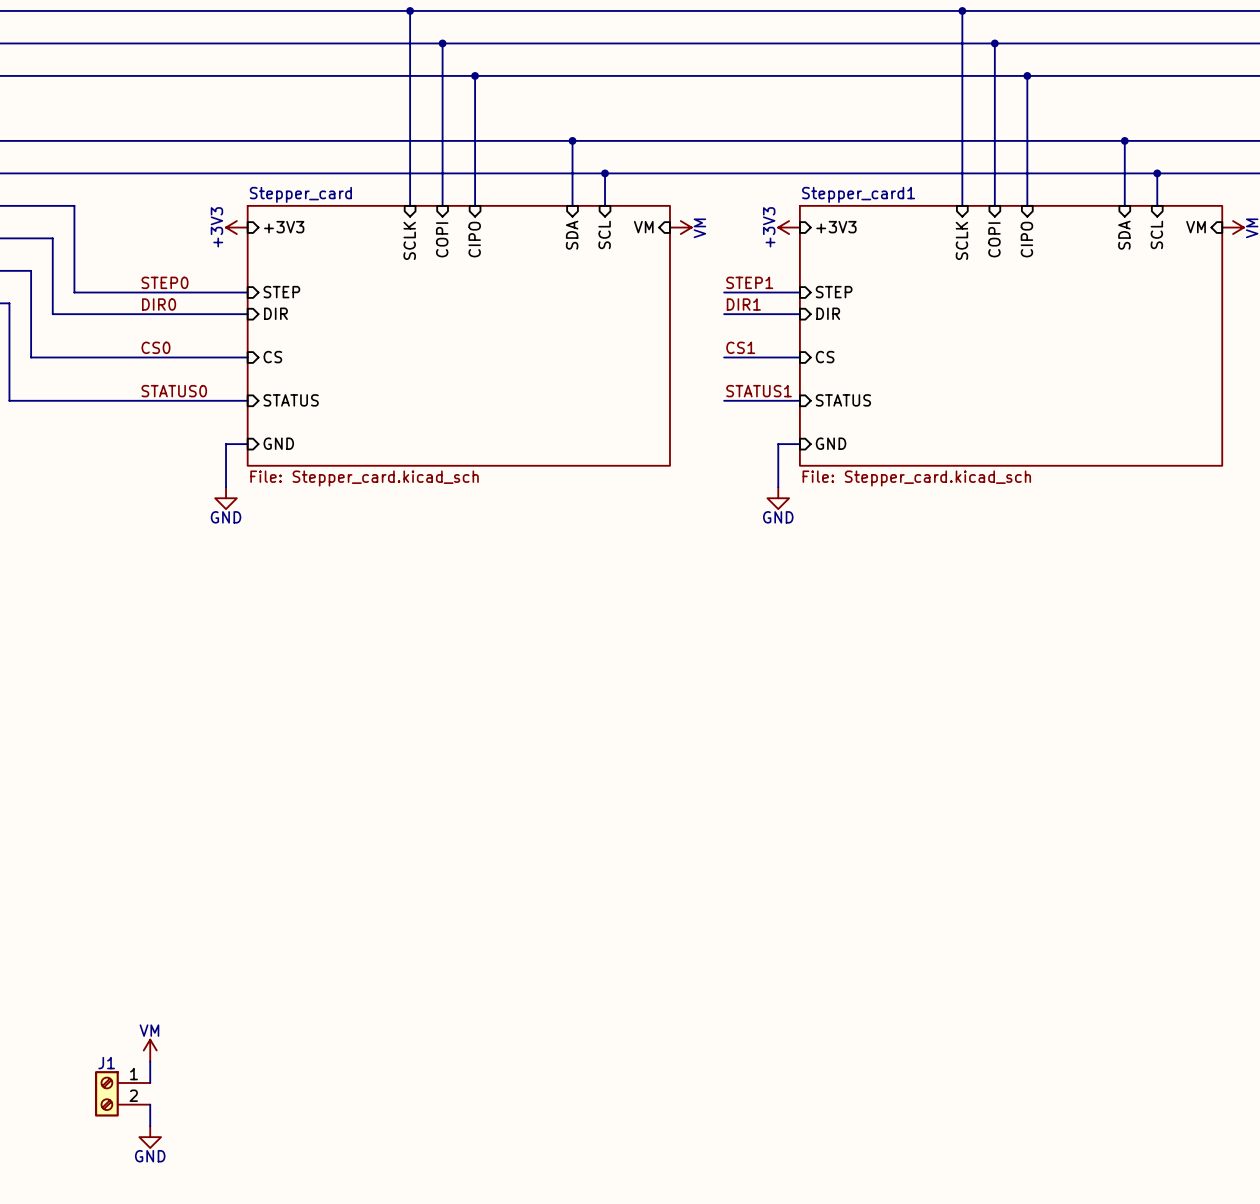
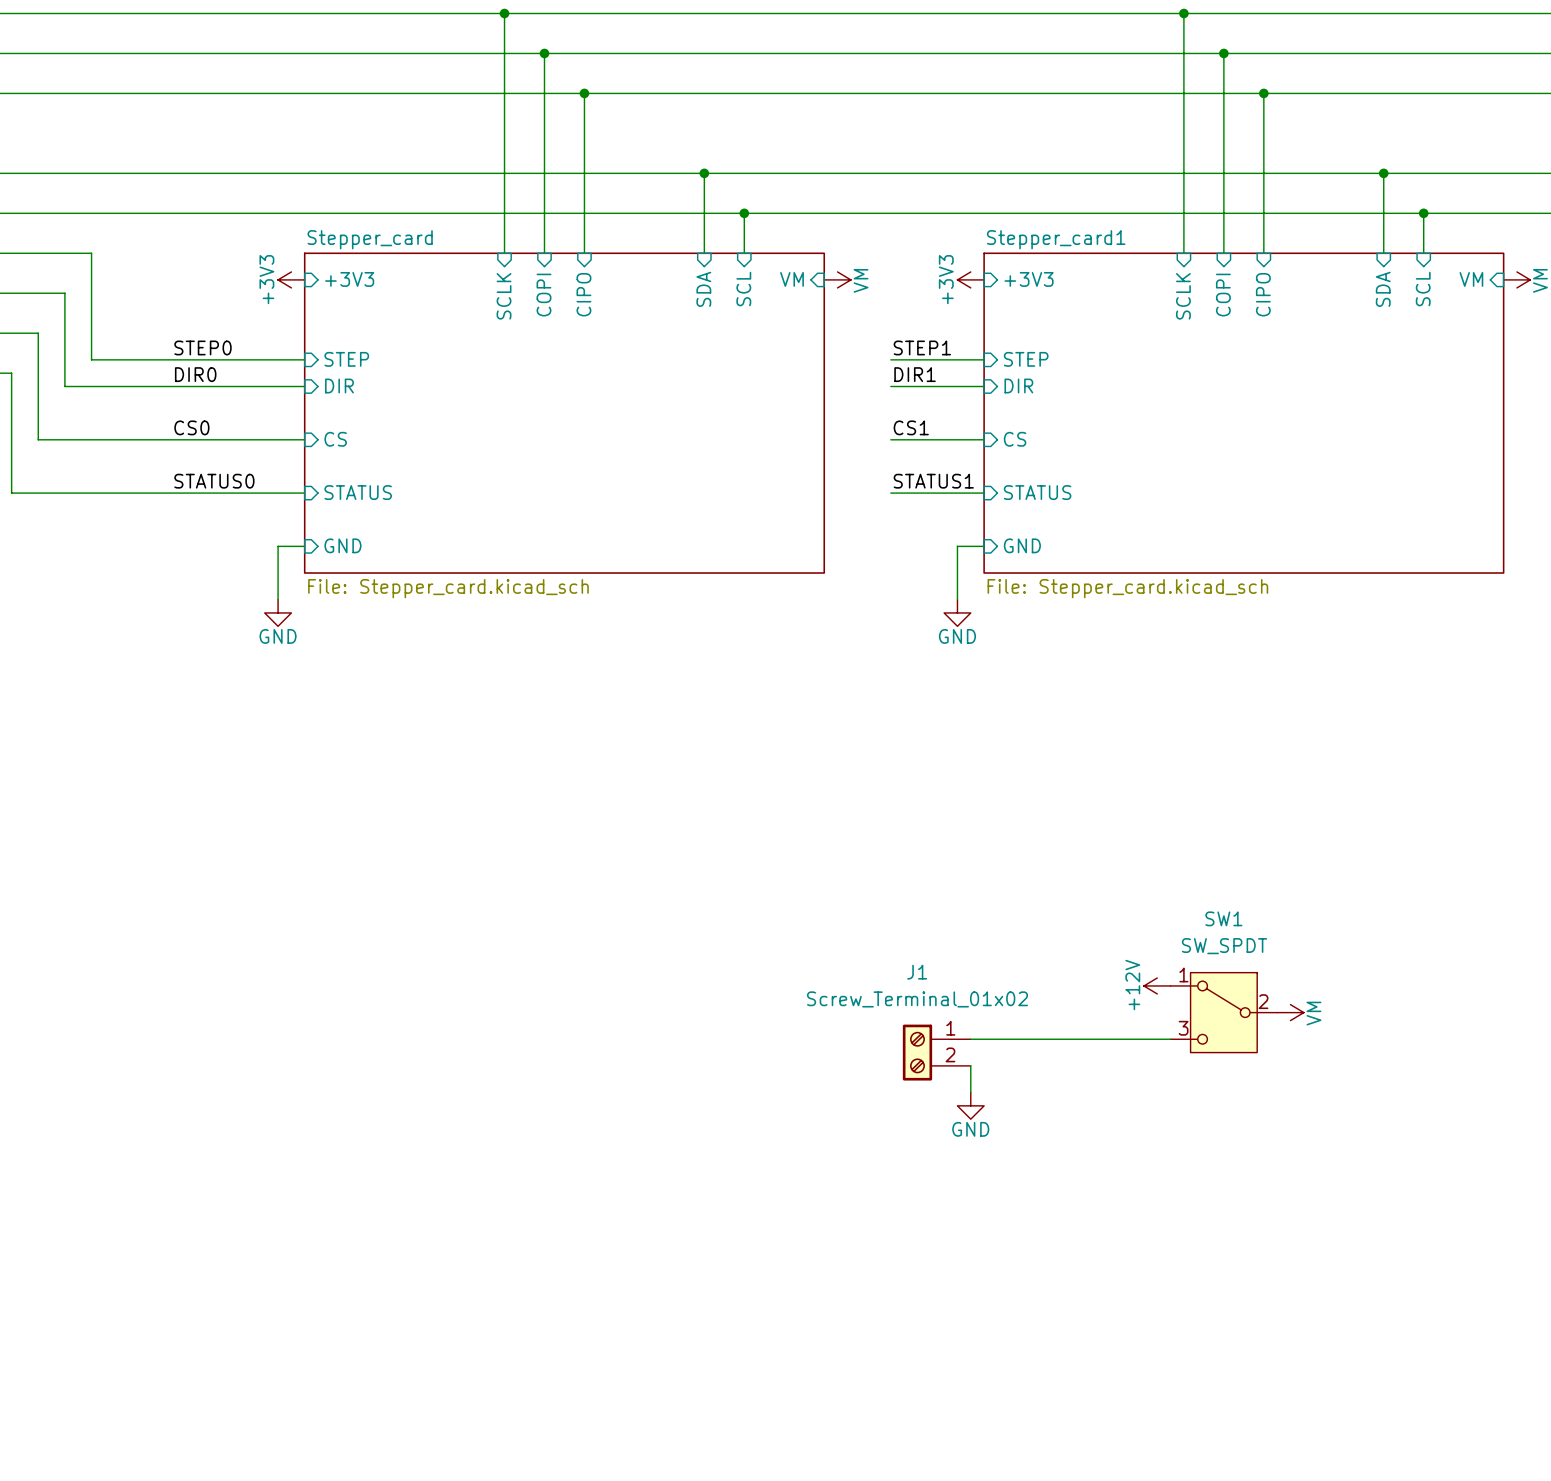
power symbol: none -> +12V (1157, 985)
J1 value: none -> Screw_Terminal_01x02 (917, 999)
SW1: none -> SW_SPDT (1223, 1012)
power symbol: none -> VM (1290, 1012)
wire: none -> (970, 1039) (1170, 1039)
wire: none -> (970, 1065) (970, 1092)
power symbol: none -> GND (970, 1105)
power symbol: VM (150, 1050) -> none
wire: (150, 1061) (150, 1082) -> none
J1 name position: J1 (106, 1063) -> J1 (917, 972)
J1 position: (122, 1093) -> (936, 1052)
wire: (150, 1104) (150, 1126) -> none
power symbol: GND (150, 1137) -> none

